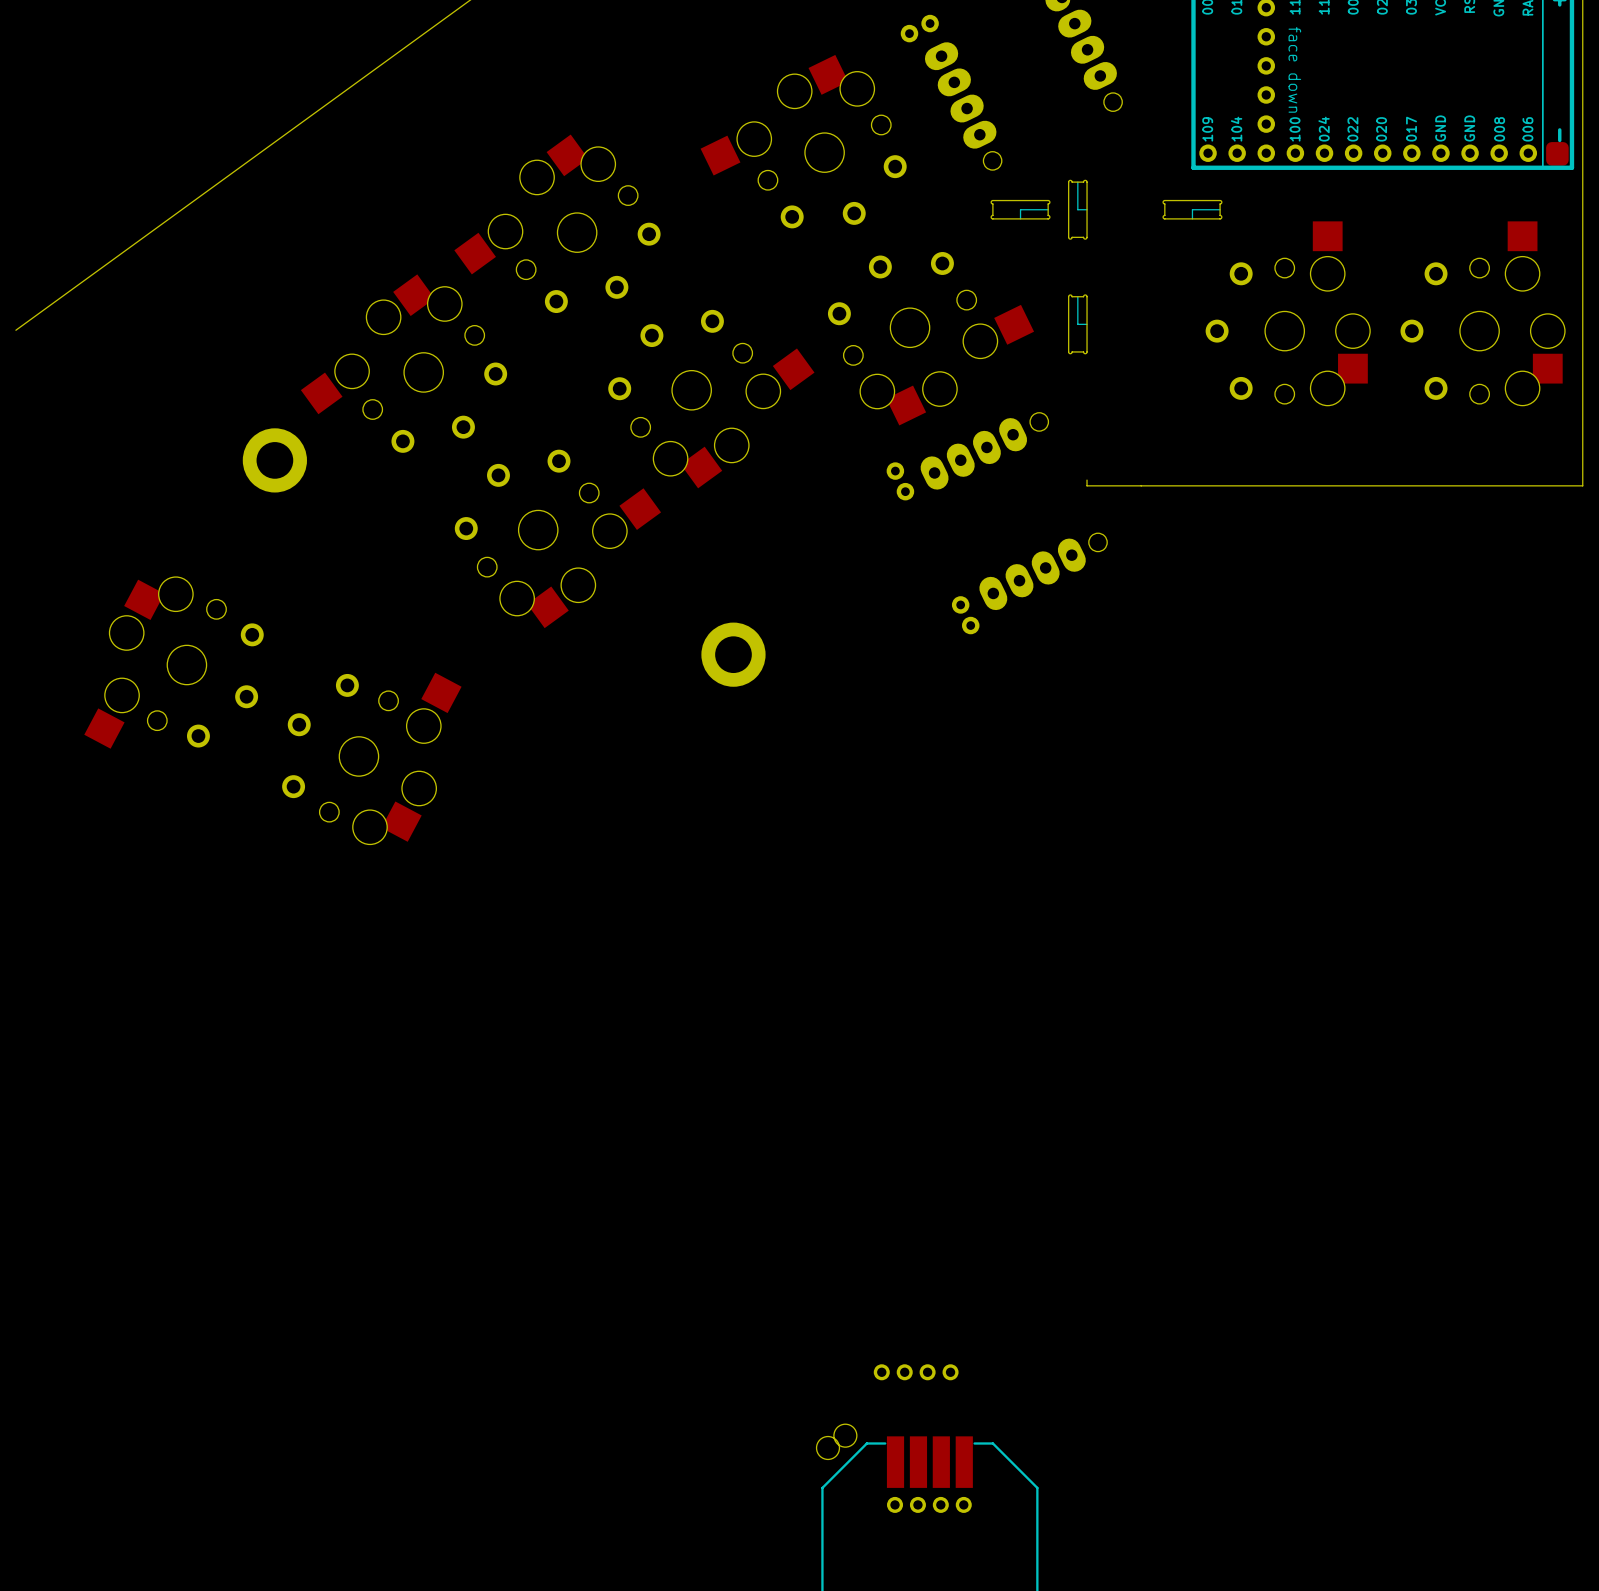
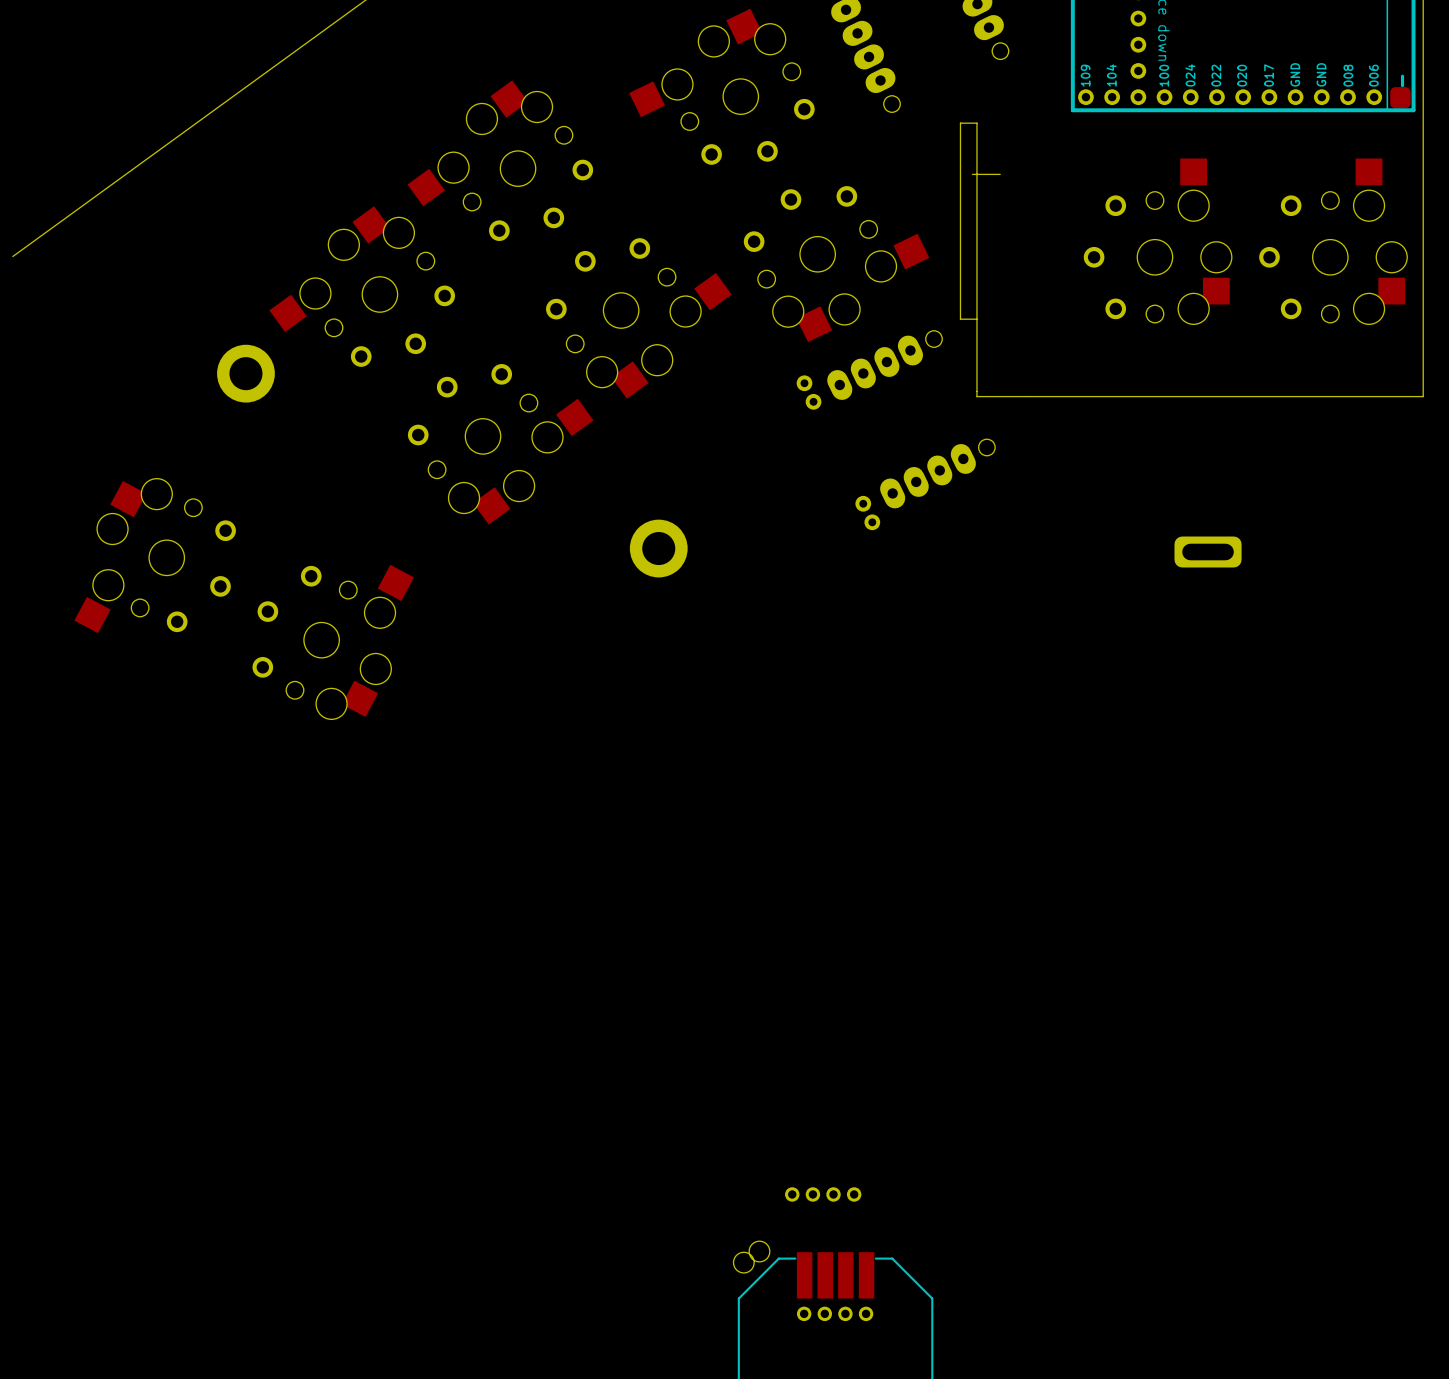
drawing: [1068, 179, 1088, 240] -> none
drawing: [990, 199, 1051, 220] -> none
drawing: [1162, 199, 1223, 220] -> none
board edge: none -> (972, 174) (1000, 174)
drawing: [1068, 294, 1088, 355] -> none
board edge: none -> (976, 319) (960, 319) (960, 123) (976, 123) (976, 391)
part: none -> (1208, 551)

